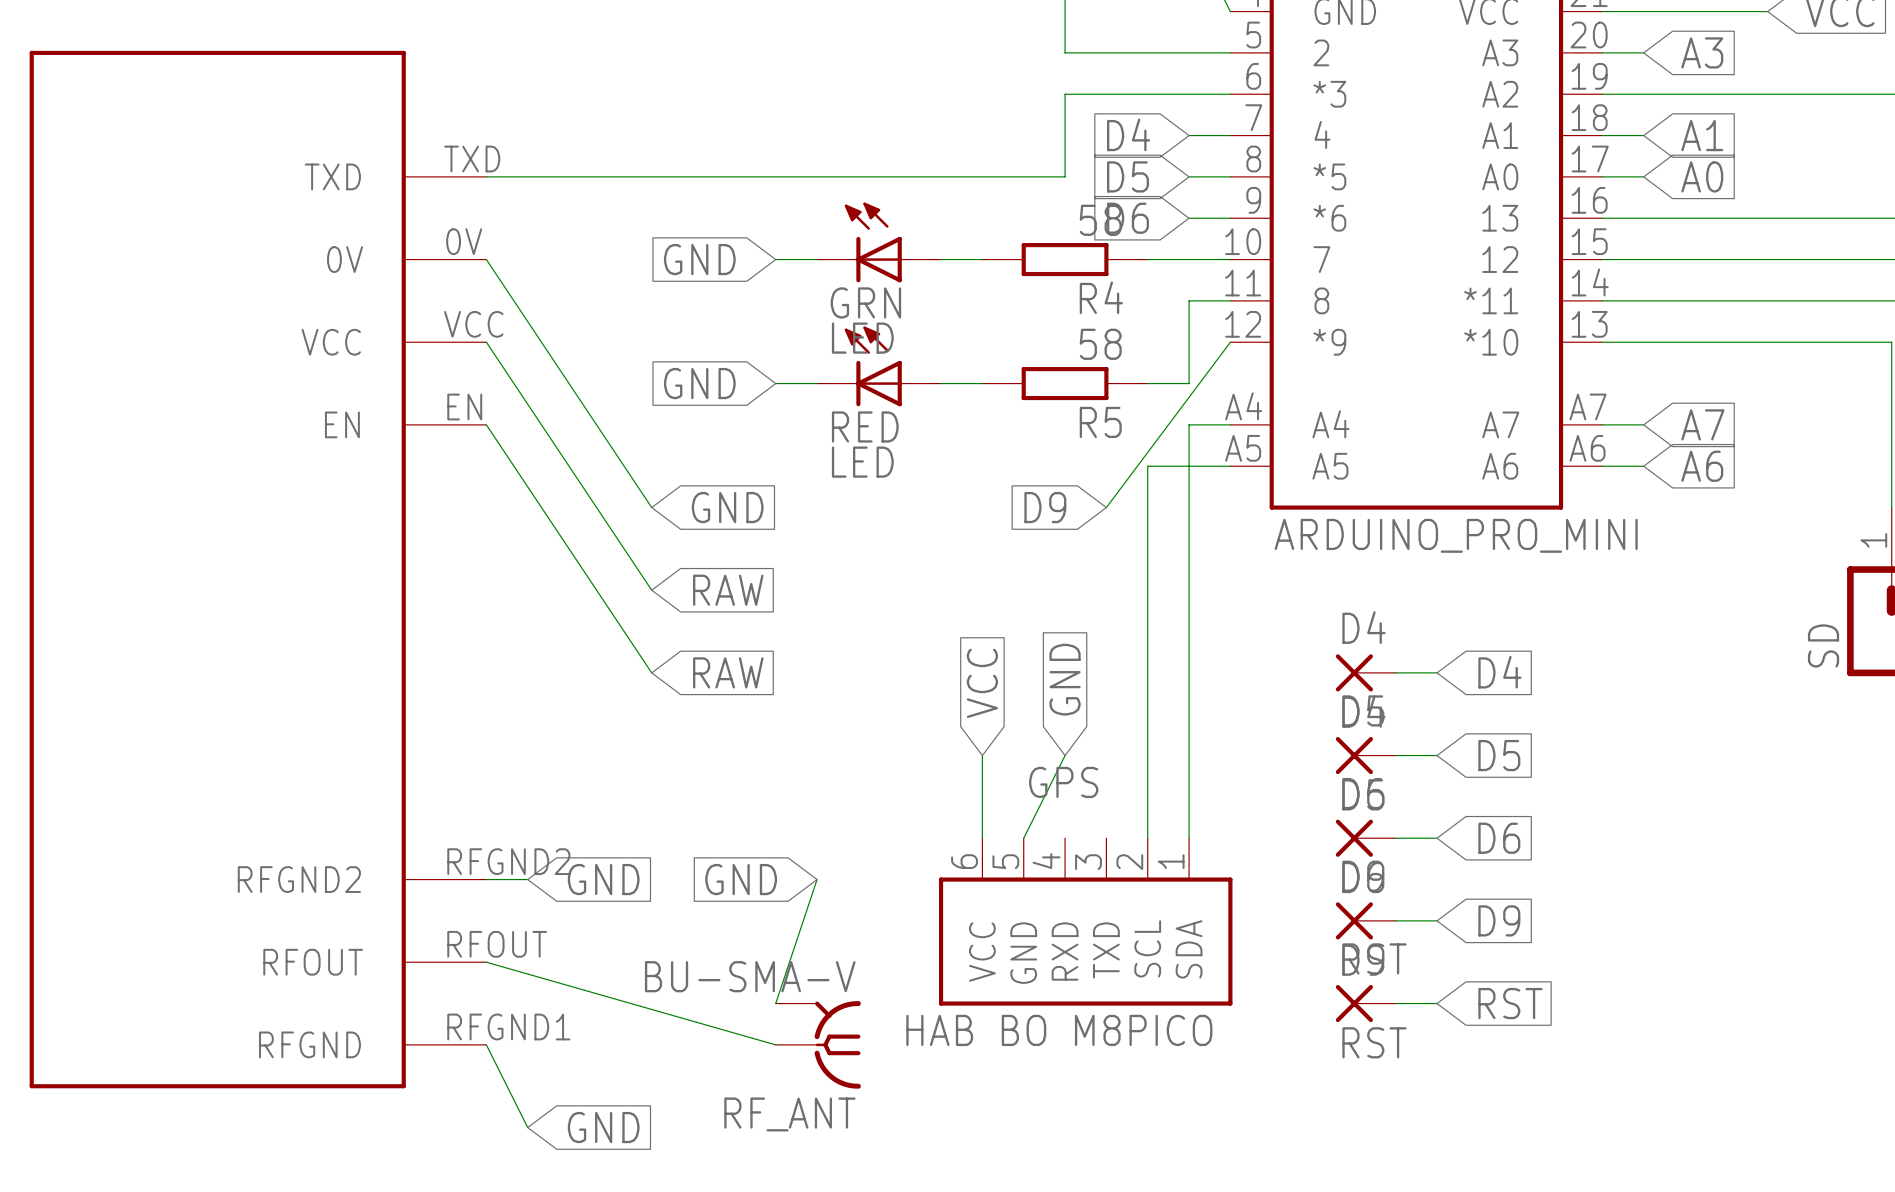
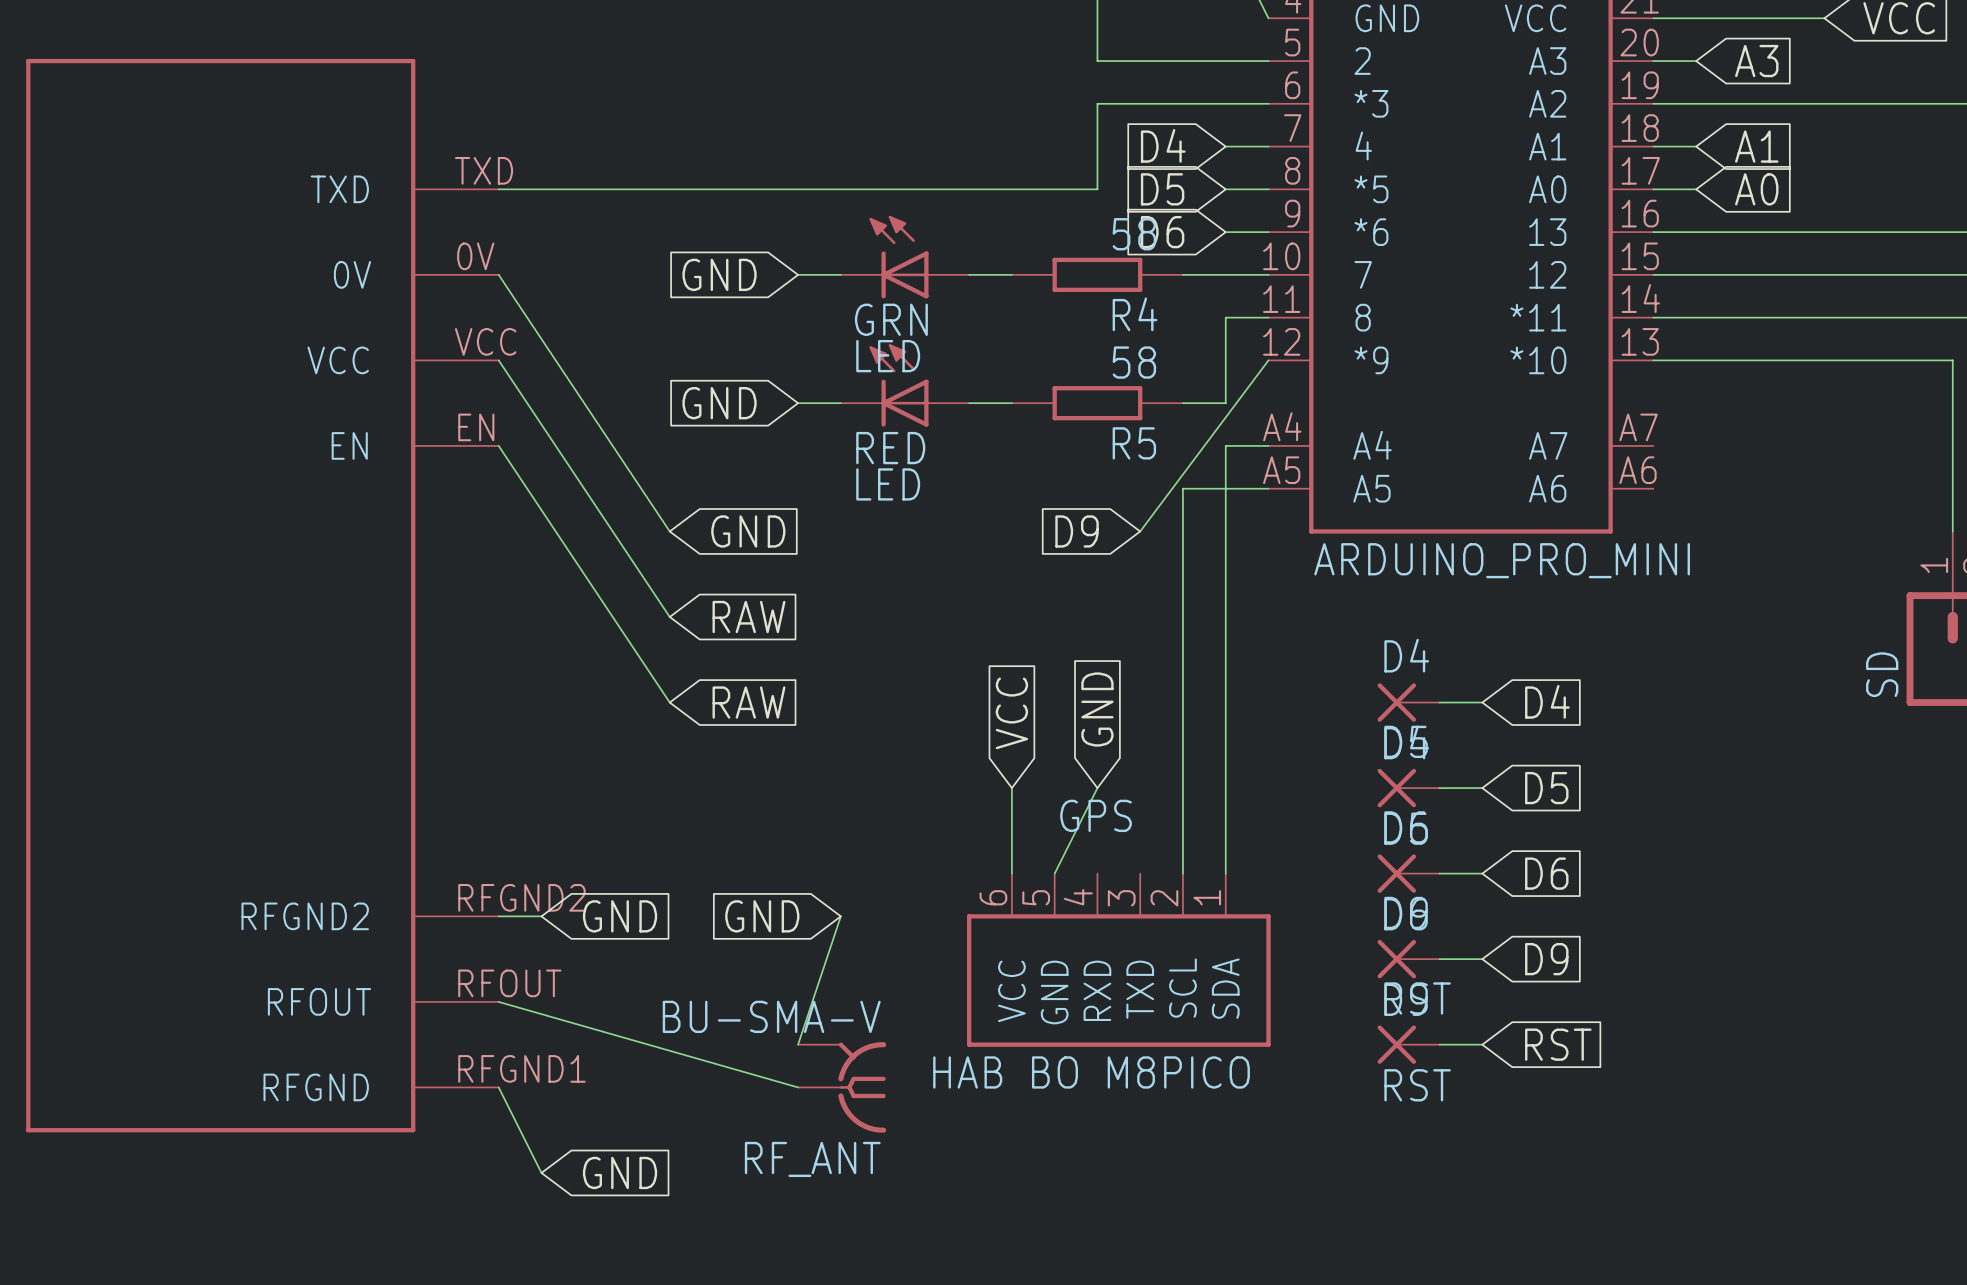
wire: (1602, 424) (1643, 424) -> none
global label: A7 (1702, 424) -> none
wire: (1602, 466) (1643, 466) -> none
global label: A6 (1702, 466) -> none

